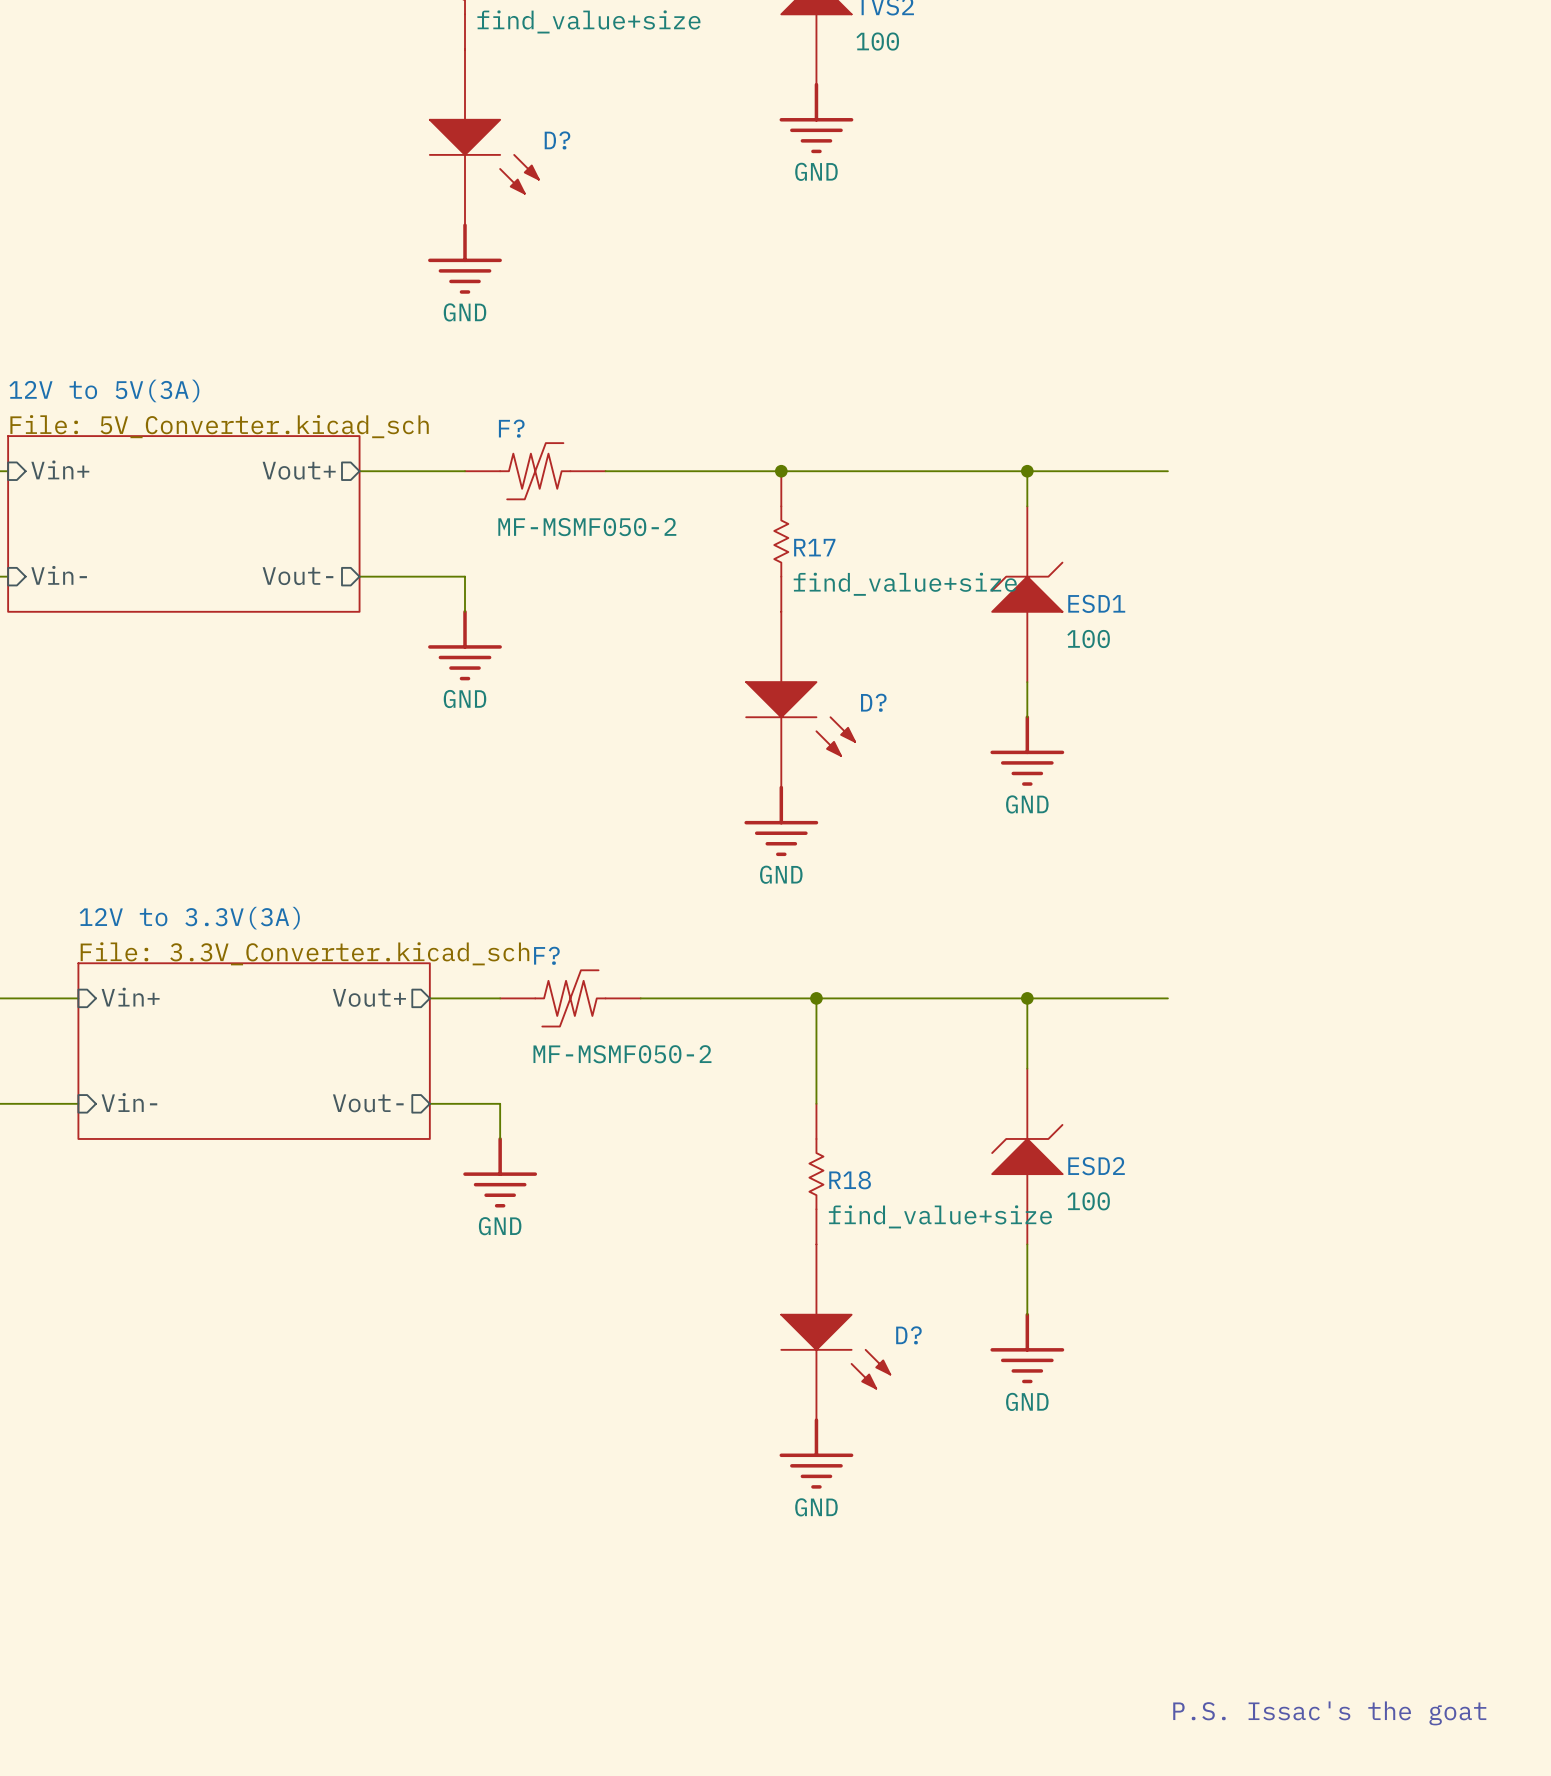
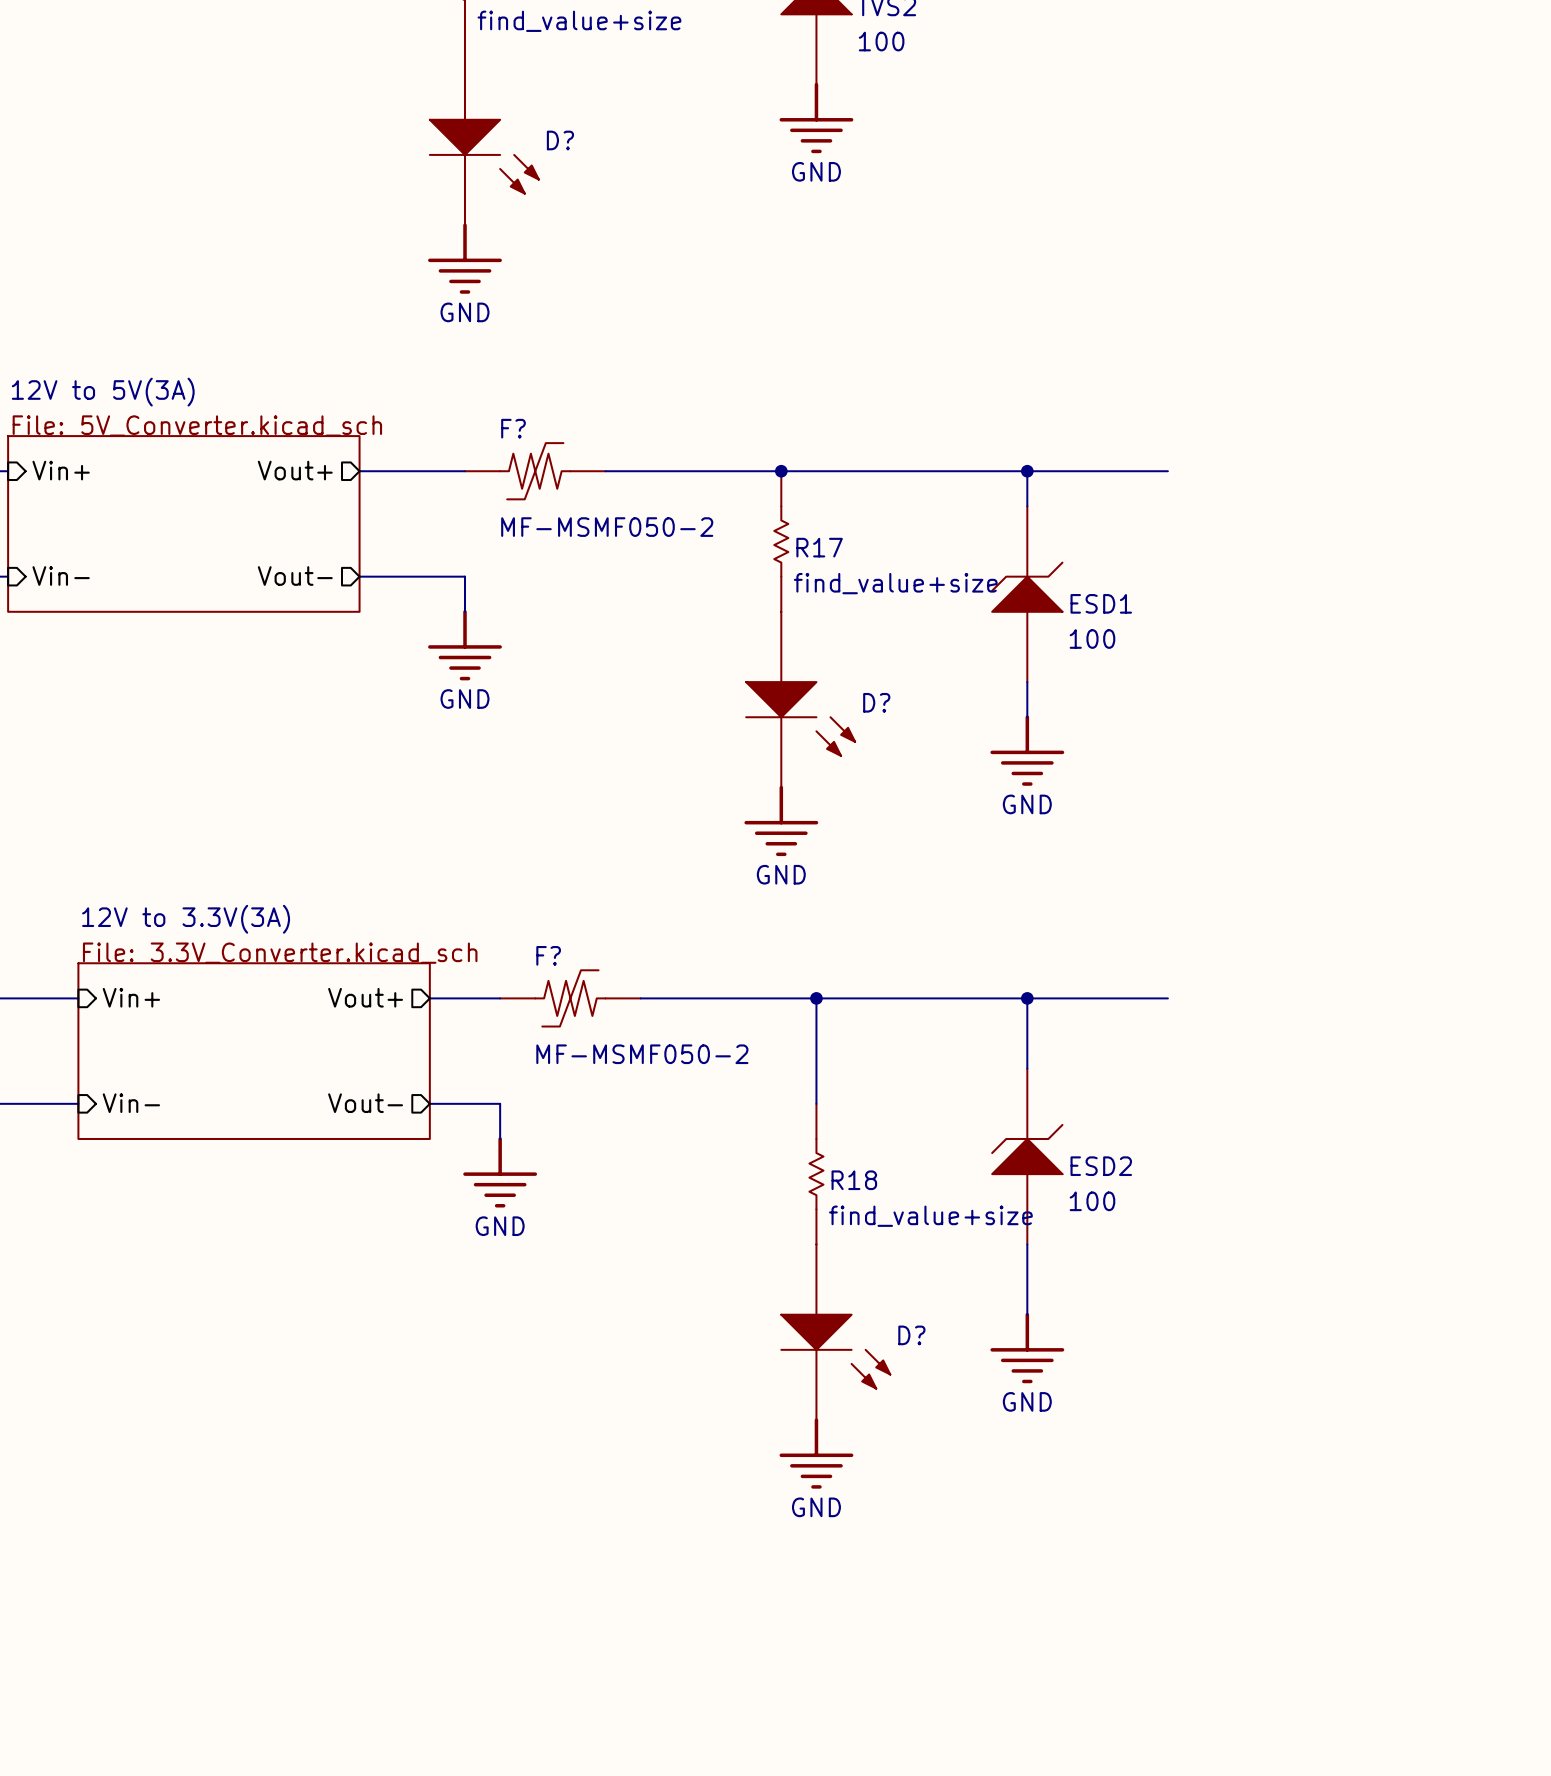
text: P.S. Issac's the goat (1329, 1713) -> none

